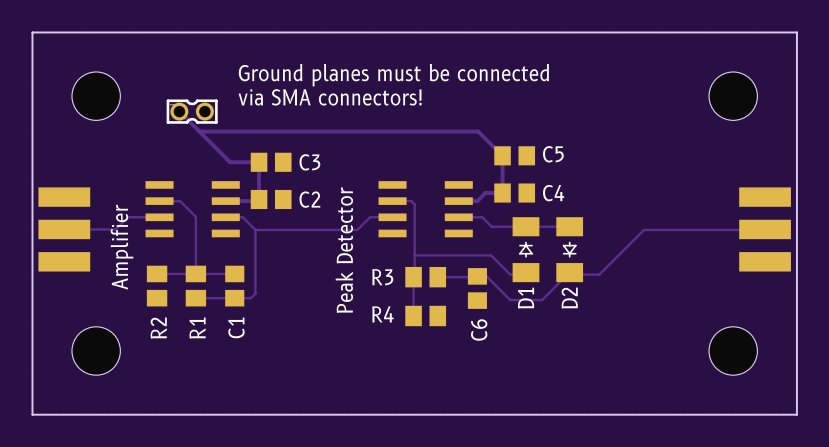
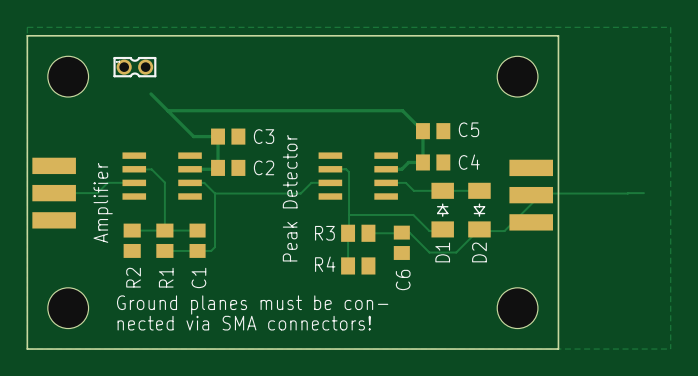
board edge: (32, 42) (32, 32) (796, 32) (796, 414) (663, 414) -> (27, 35) (558, 35) (558, 349)
text: Ground planes must be connected (393, 75) -> none
hole position: (96, 96) -> (68, 76)
hole position: (733, 96) -> (517, 76)
text: via SMA connectors! (330, 97) -> none
part position: (192, 111) -> (134, 67)
part position: (765, 229) -> (531, 195)
hole position: (96, 351) -> (68, 308)
hole position: (733, 351) -> (517, 308)
text: none -> Ground planes must be con- (252, 304)
text: none -> nected via SMA connectors! (244, 323)

